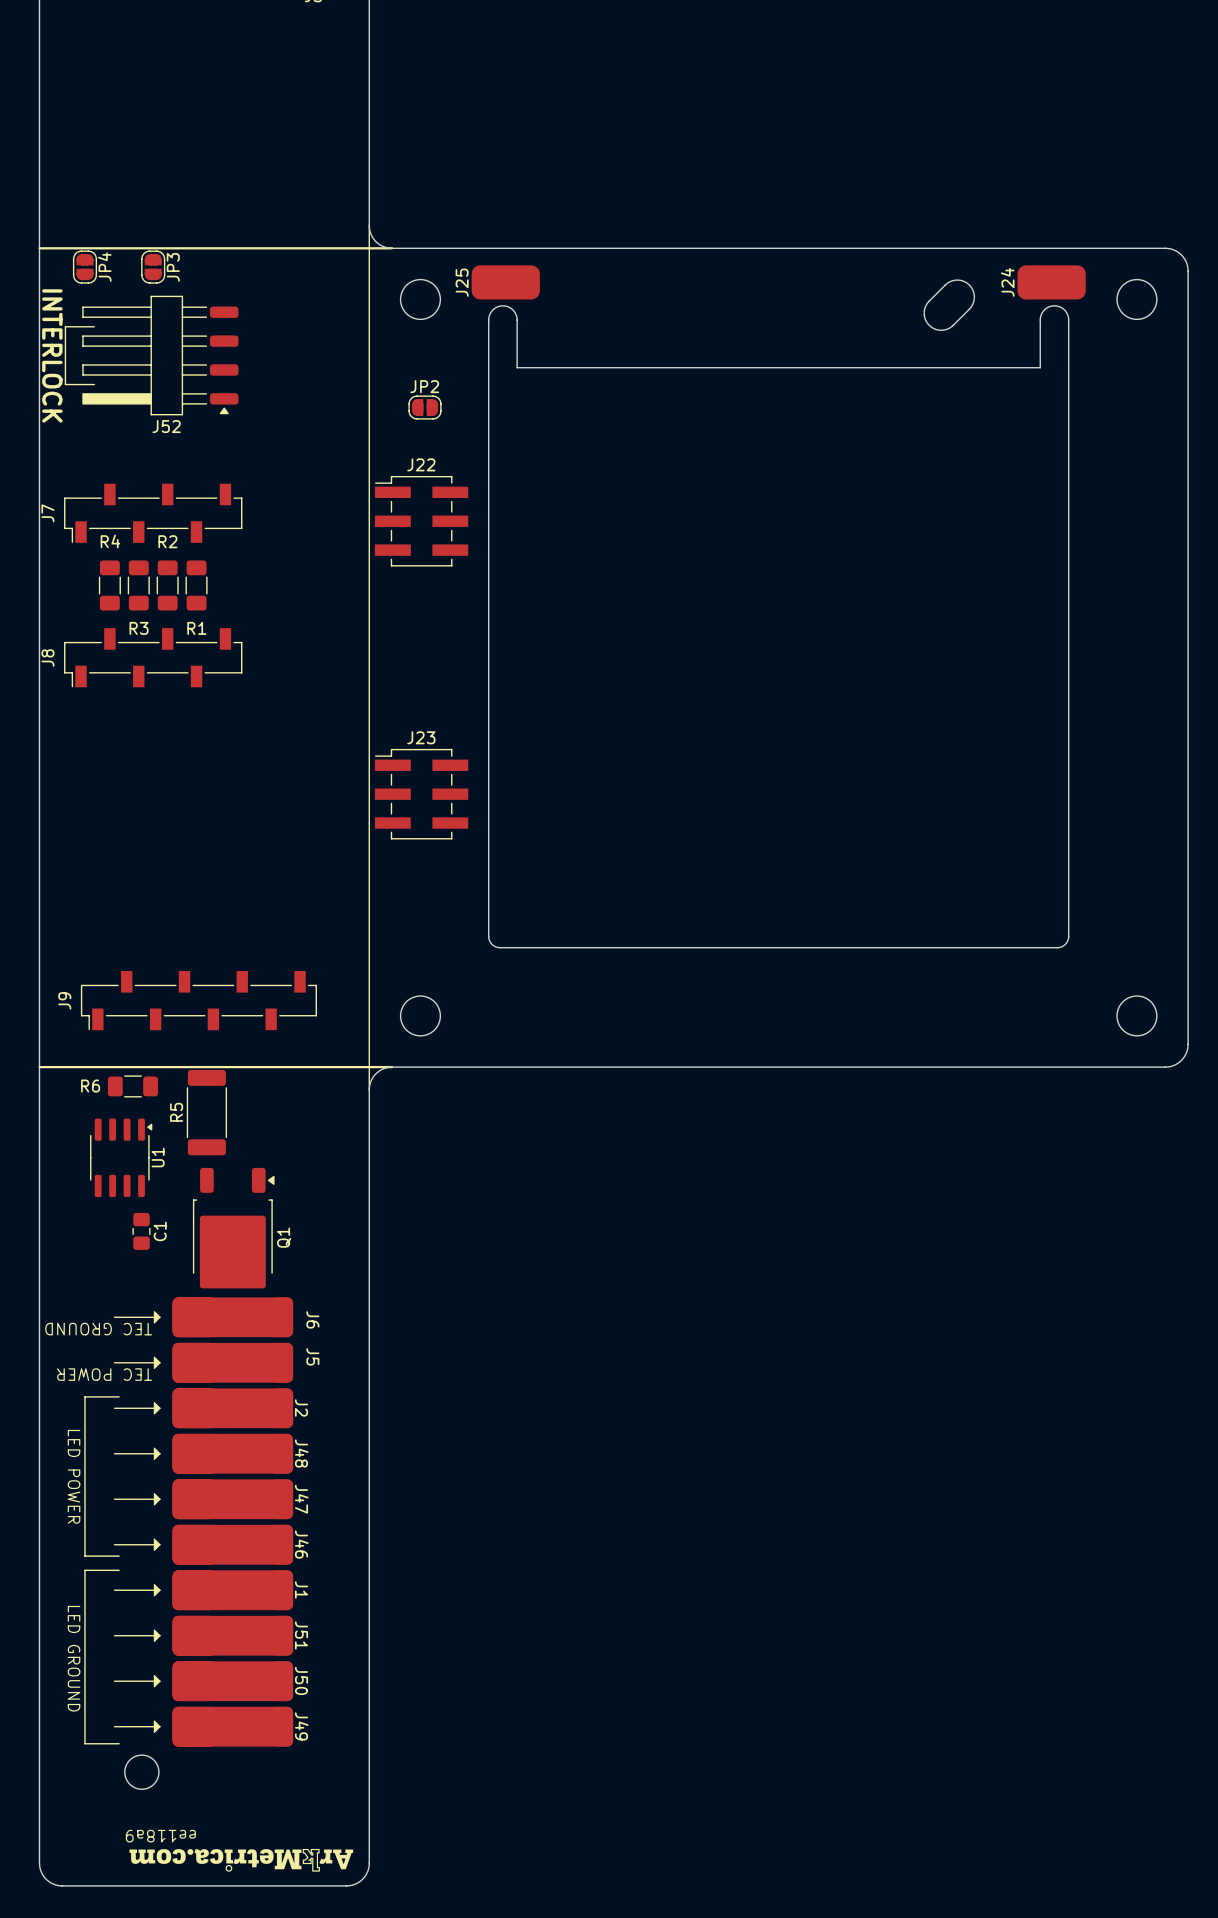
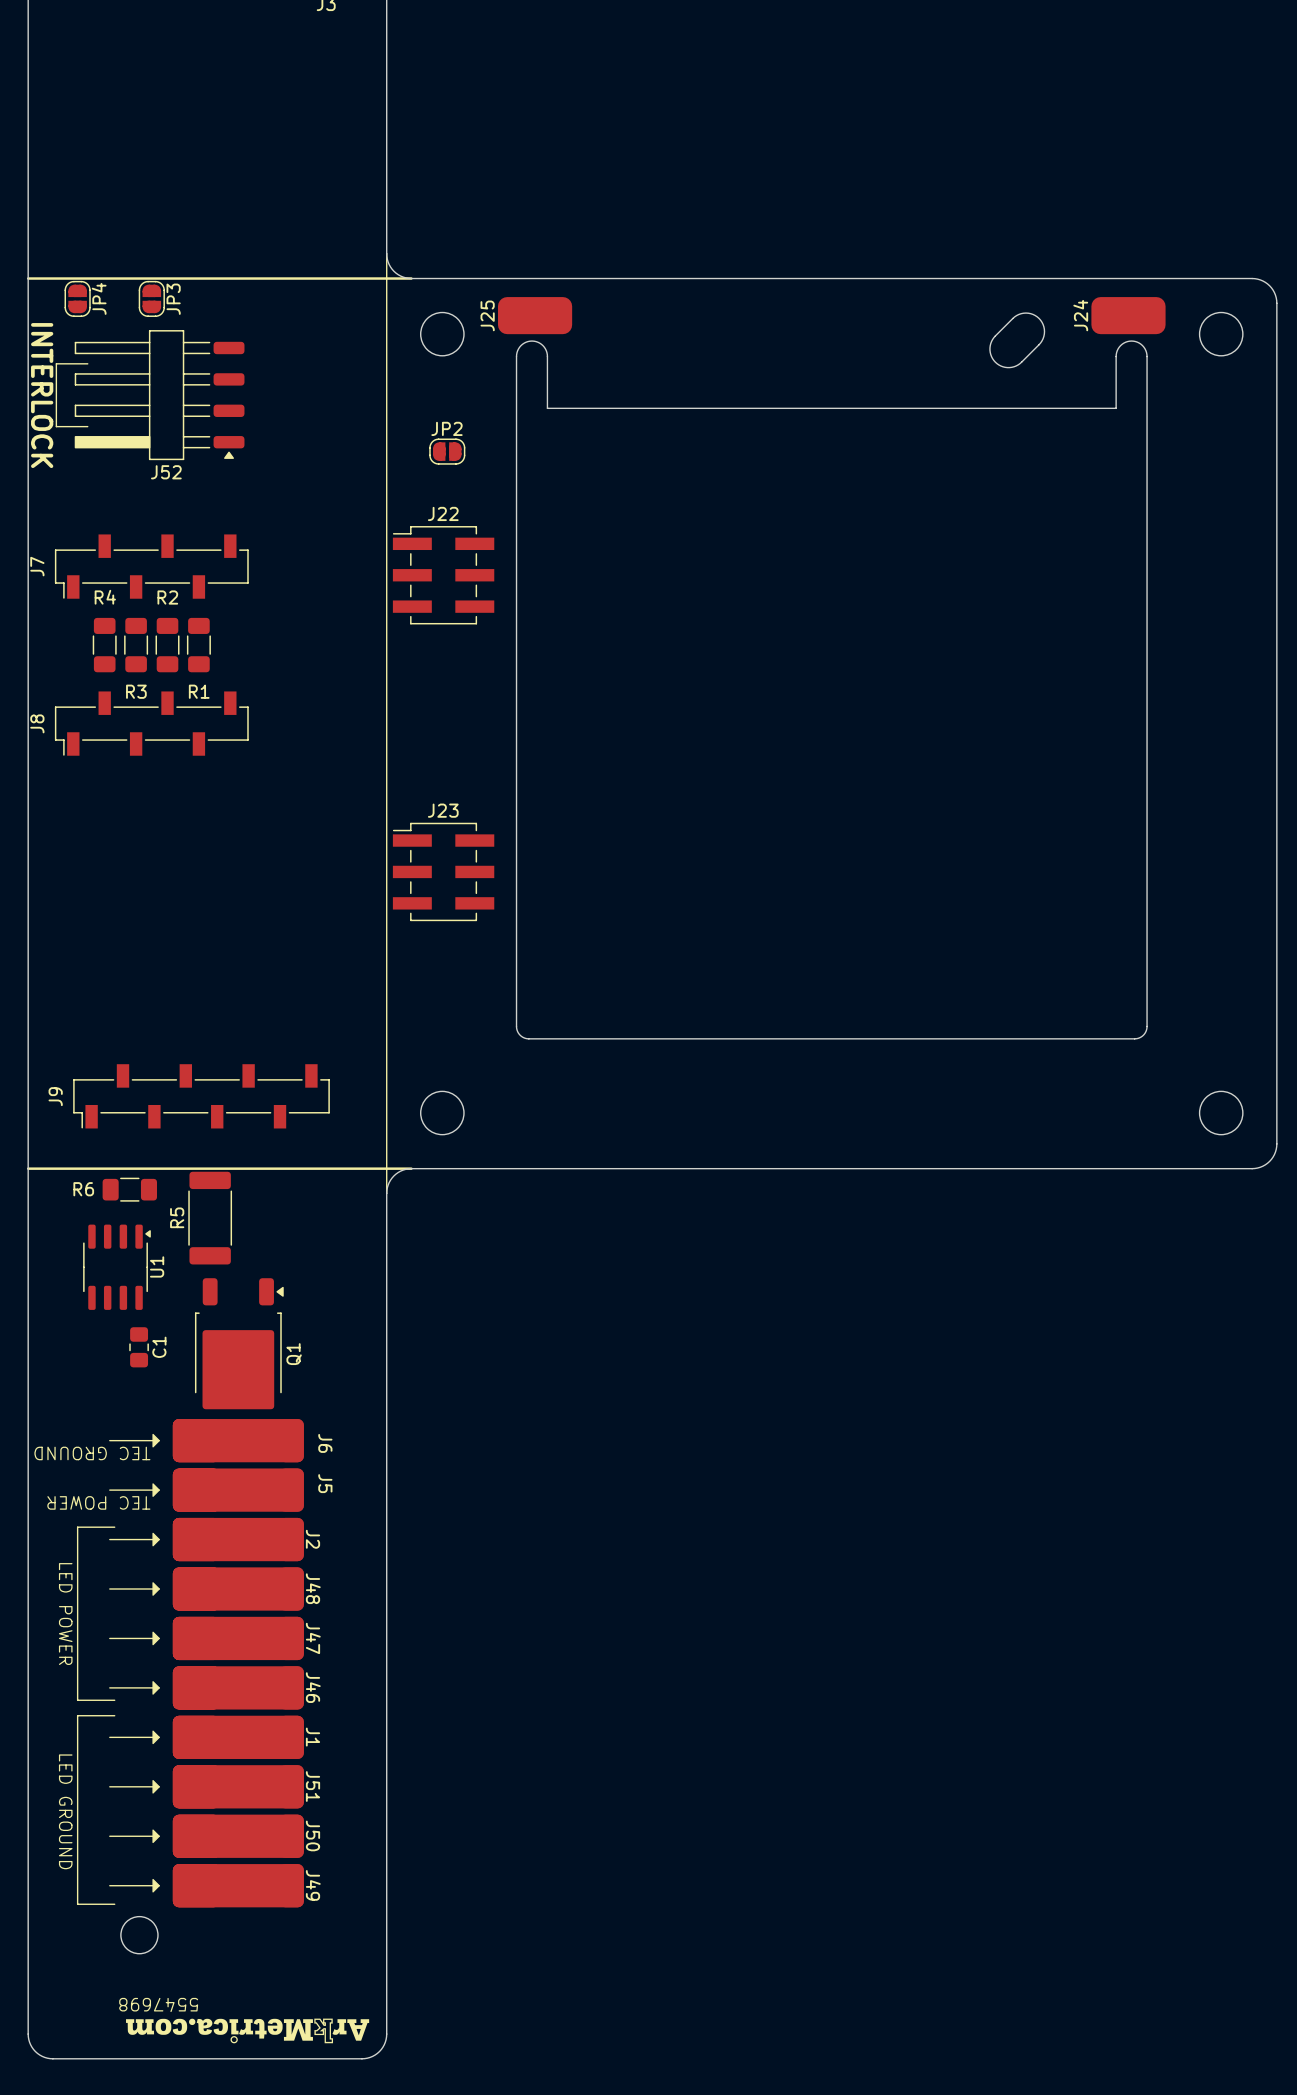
text: ee118a9 (160, 1836) -> 5547698 (158, 2004)

